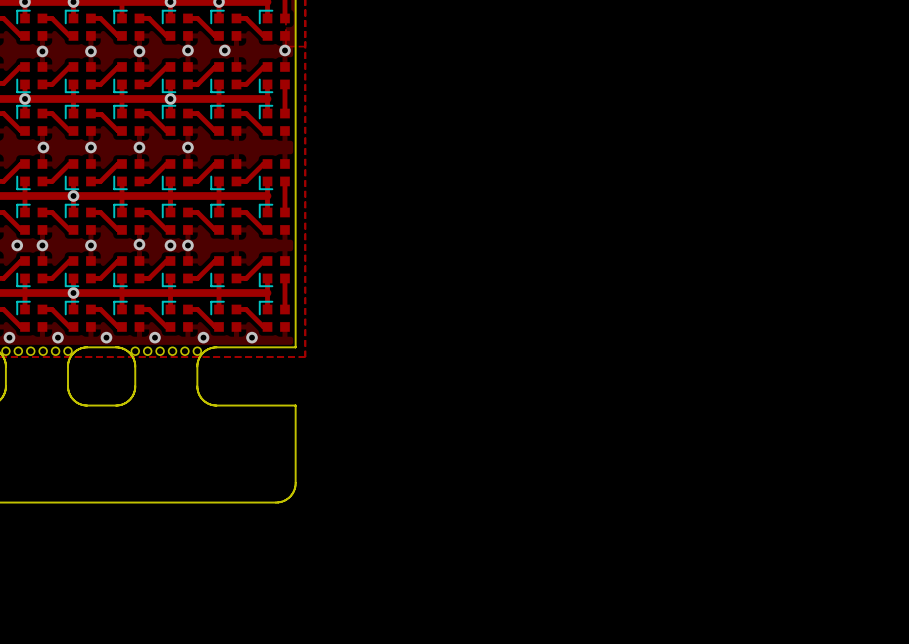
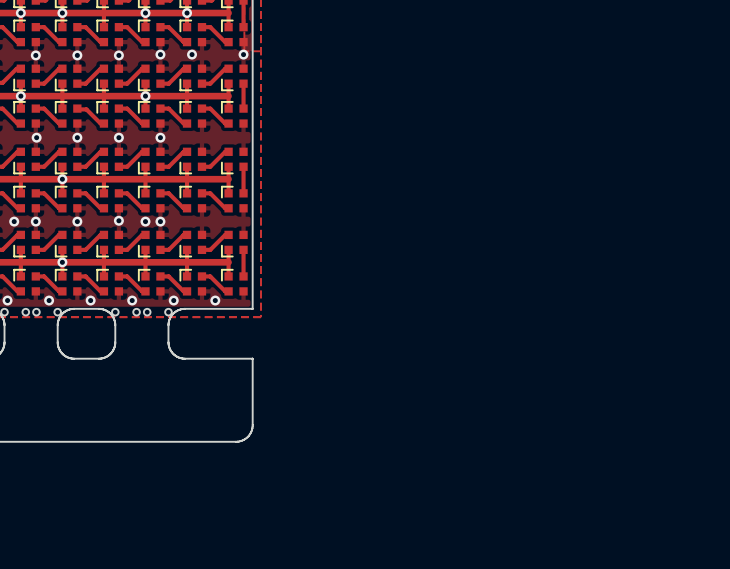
part: (18, 351) -> none
part: (55, 351) -> none
part: (147, 351) -> none
part: (184, 351) -> none

